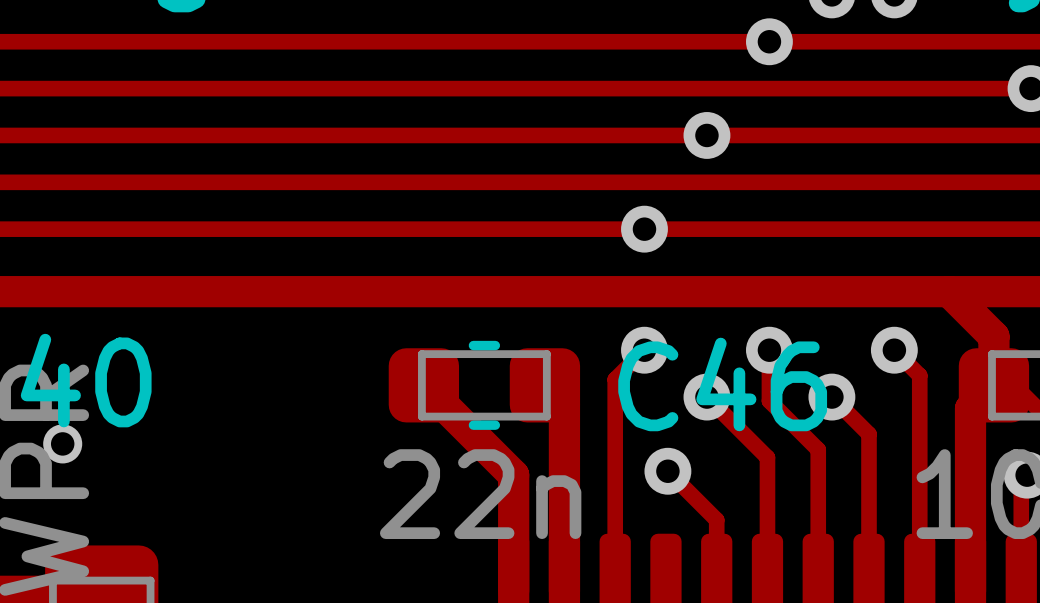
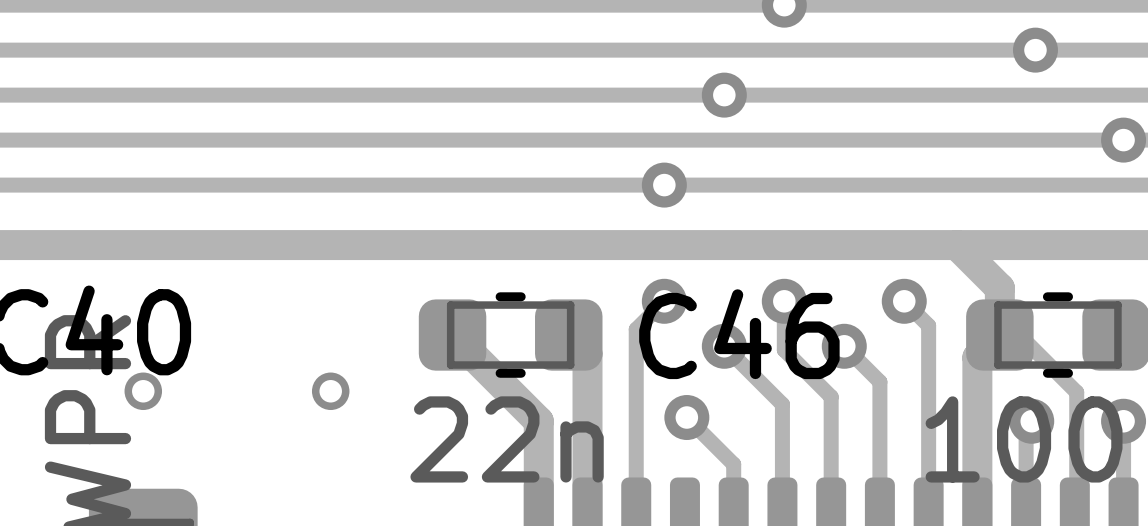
via position: (62, 443) -> (143, 391)
via: none -> (330, 391)

